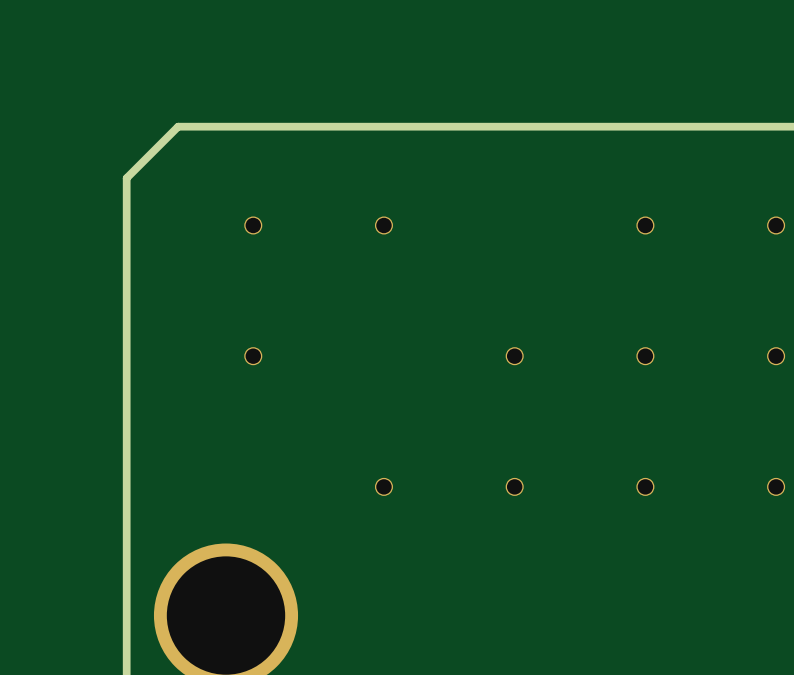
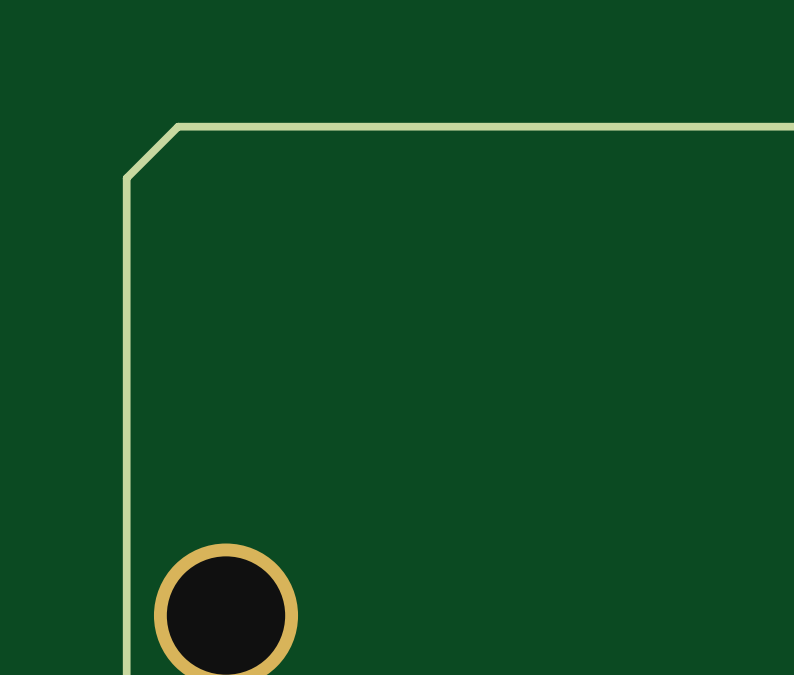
part: (253, 225) -> none
part: (383, 225) -> none
part: (645, 225) -> none
part: (776, 225) -> none
part: (253, 356) -> none
part: (514, 356) -> none
part: (645, 356) -> none
part: (776, 356) -> none
part: (383, 486) -> none
part: (514, 486) -> none
part: (645, 486) -> none
part: (776, 486) -> none

